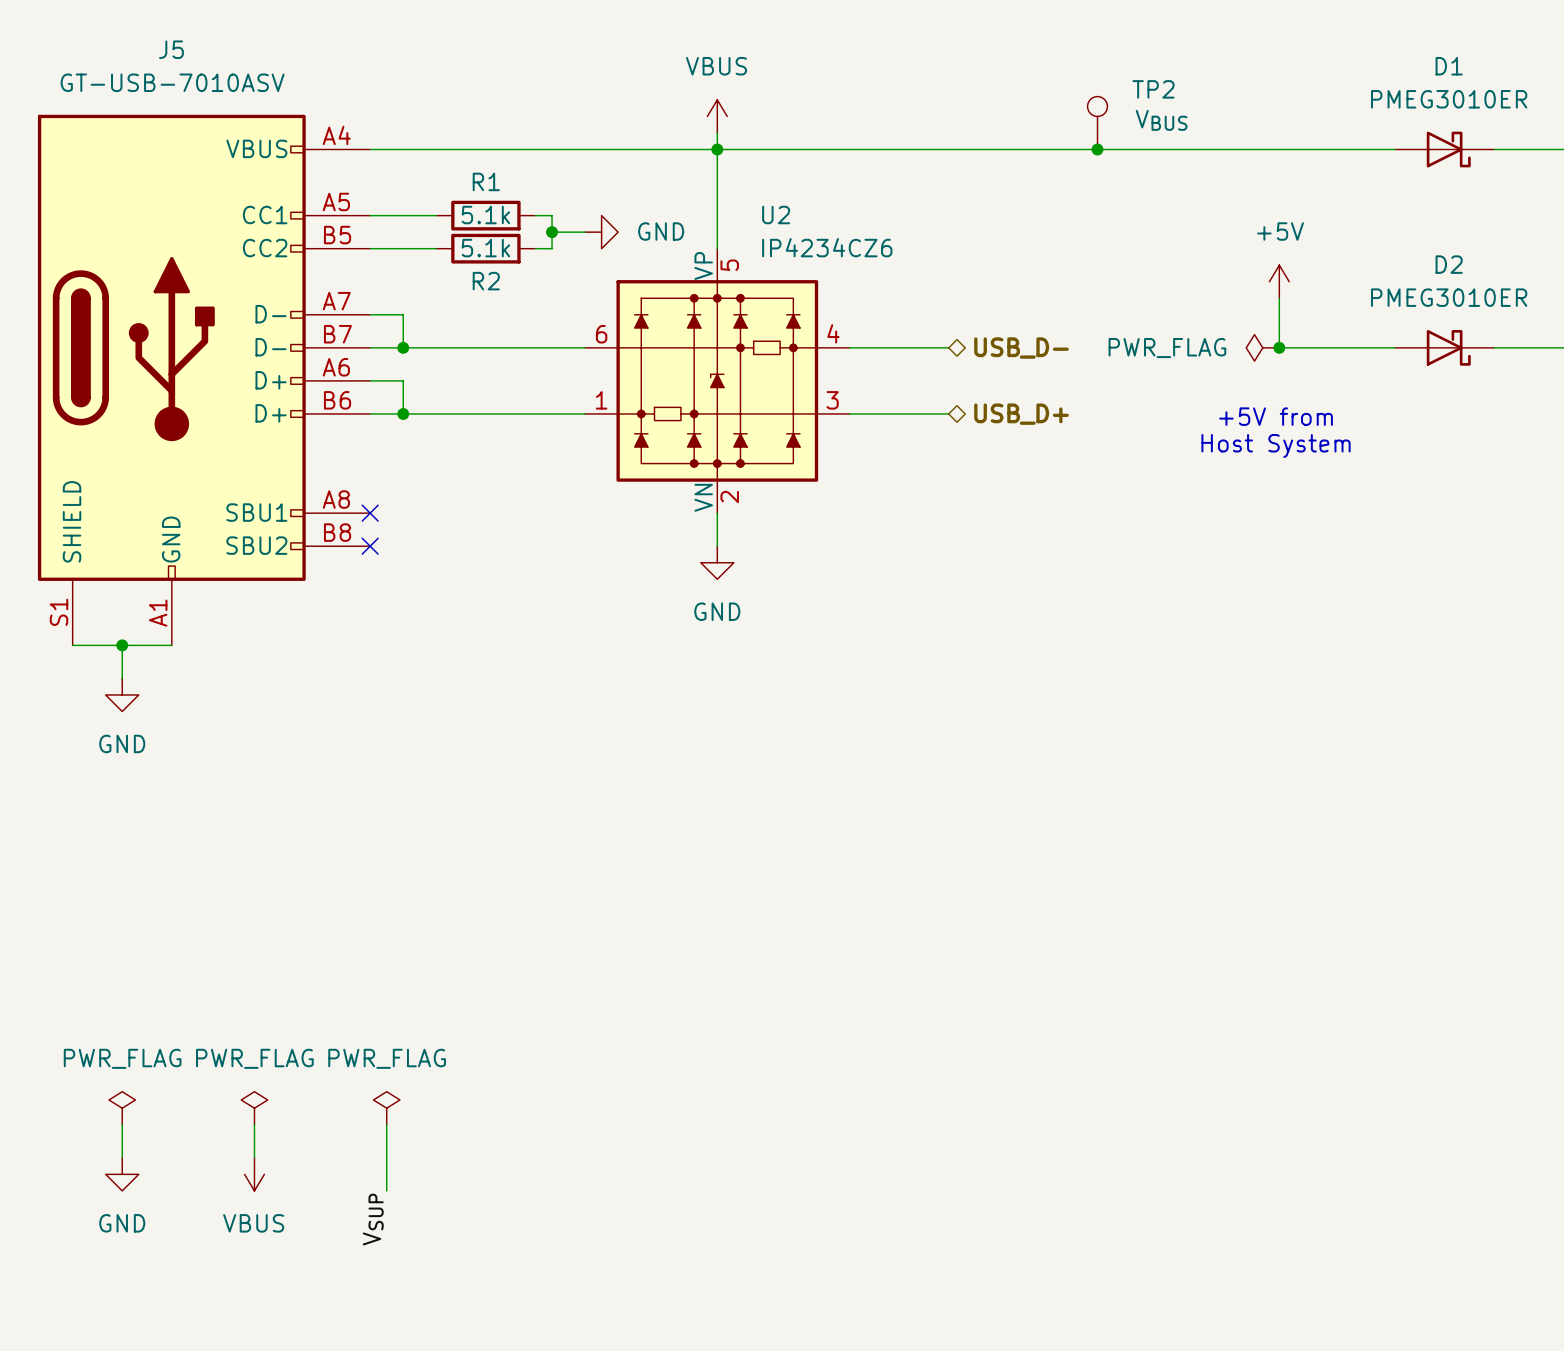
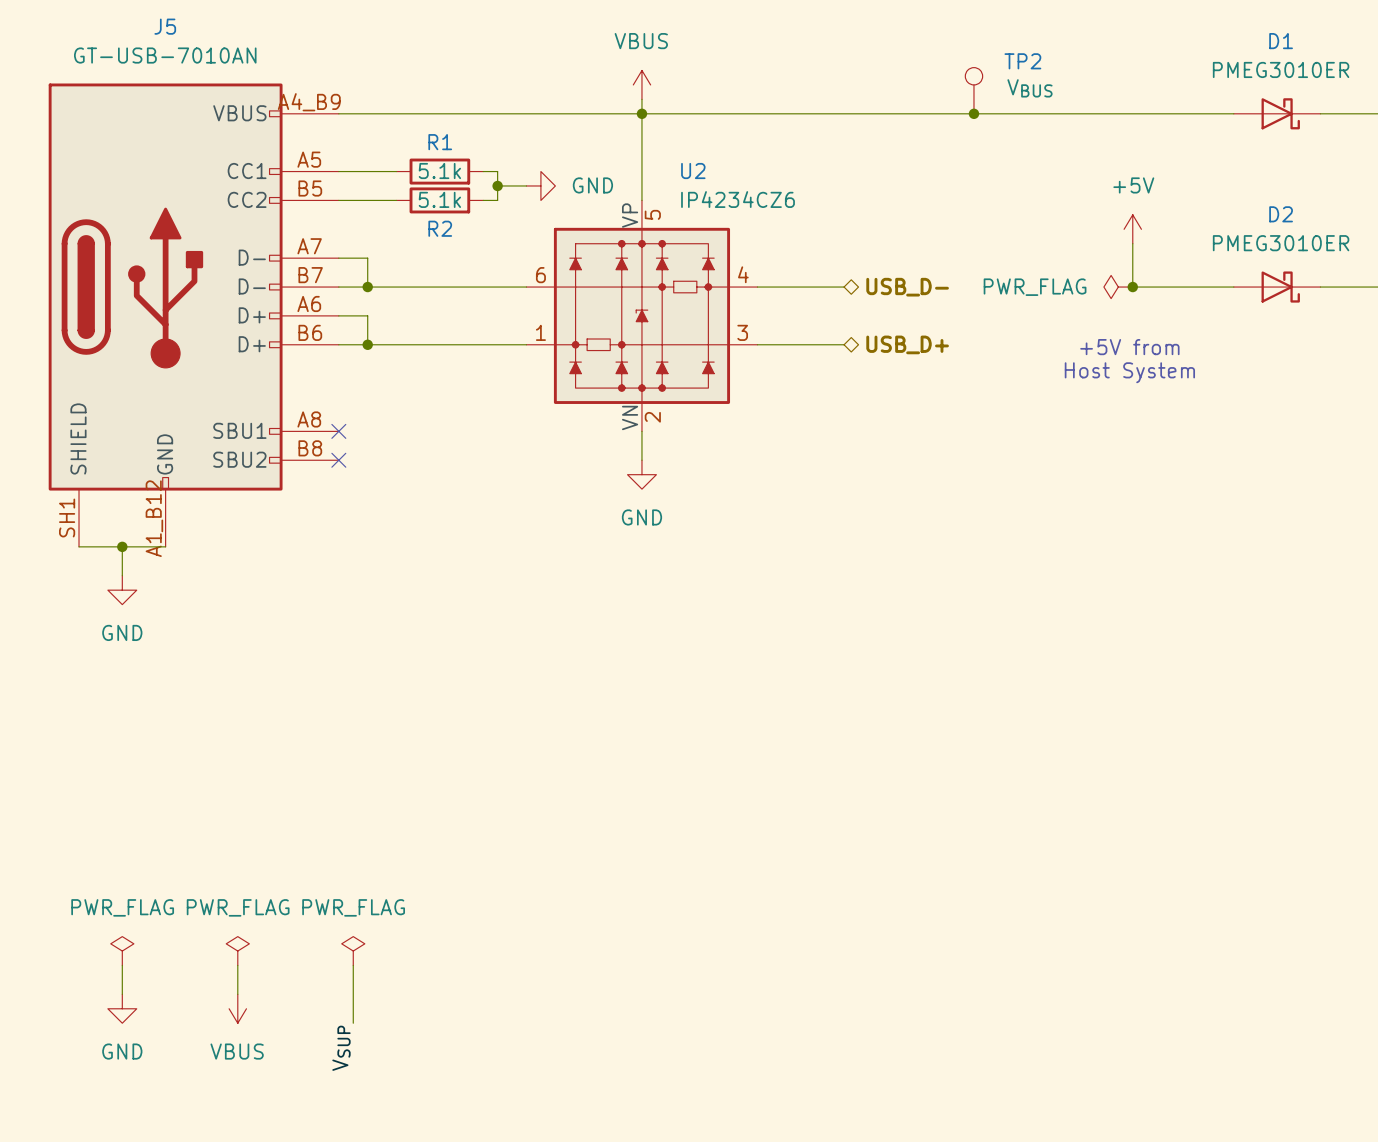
J5 value: GT-USB-7010ASV (172, 82) -> GT-USB-7010AN (165, 55)
J5 pin number: A4 (336, 135) -> A4_B9 (309, 102)
J5 pin number: S1 (59, 612) -> SH1 (67, 517)
J5 pin number: A1 (158, 613) -> A1_B12 (154, 518)

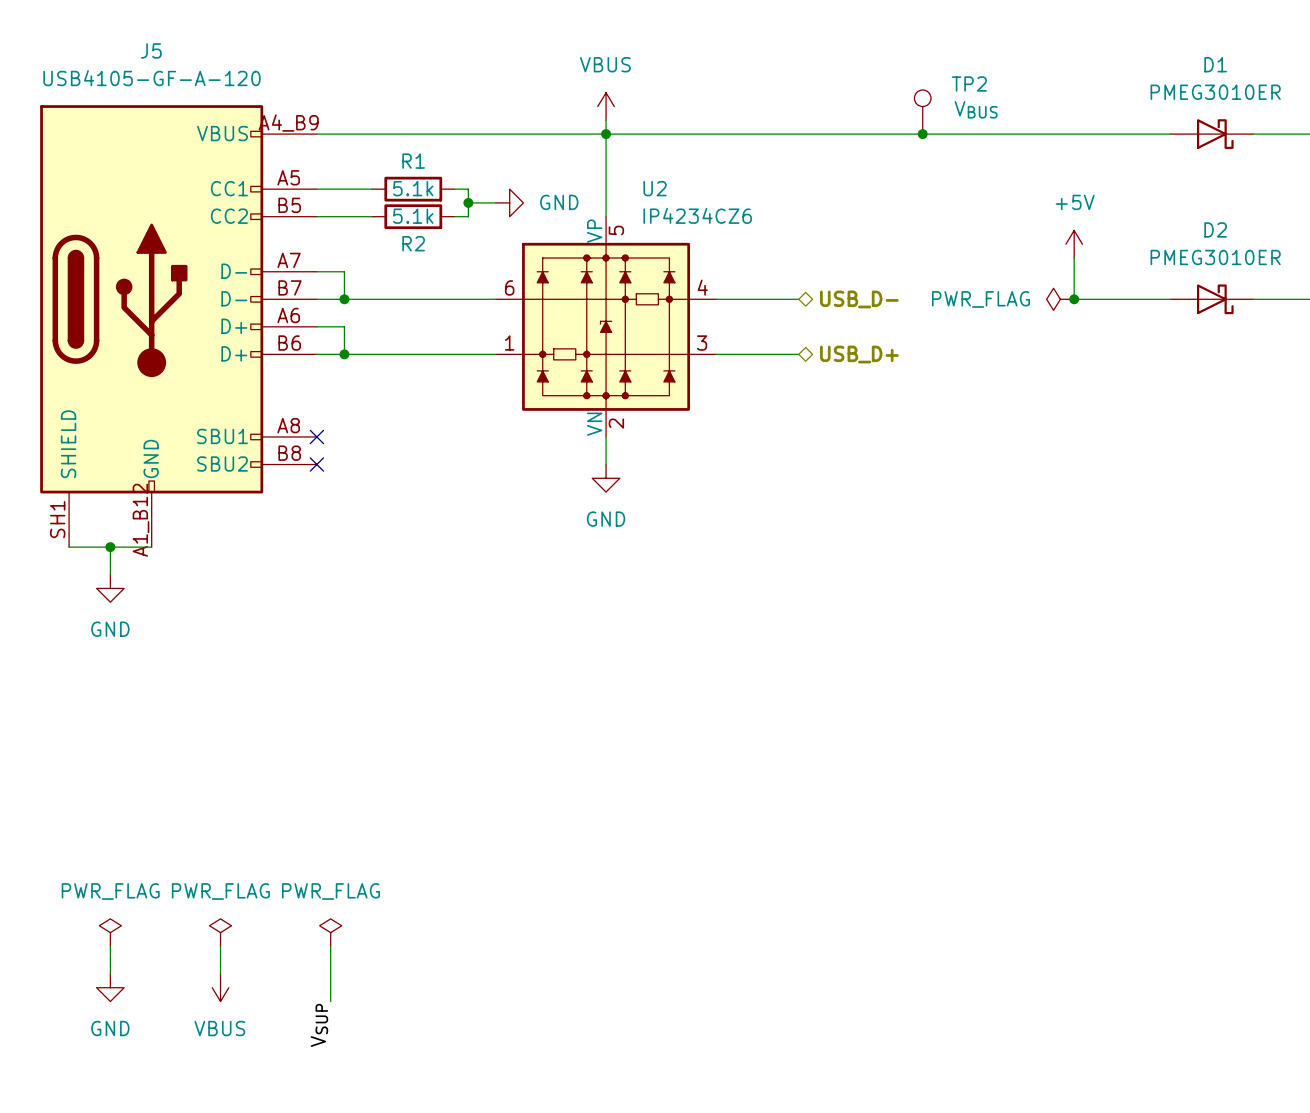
J5 value: GT-USB-7010AN (165, 55) -> USB4105-GF-A-120 (152, 78)
text: +5V from (1129, 347) -> none
text: Host System (1129, 372) -> none

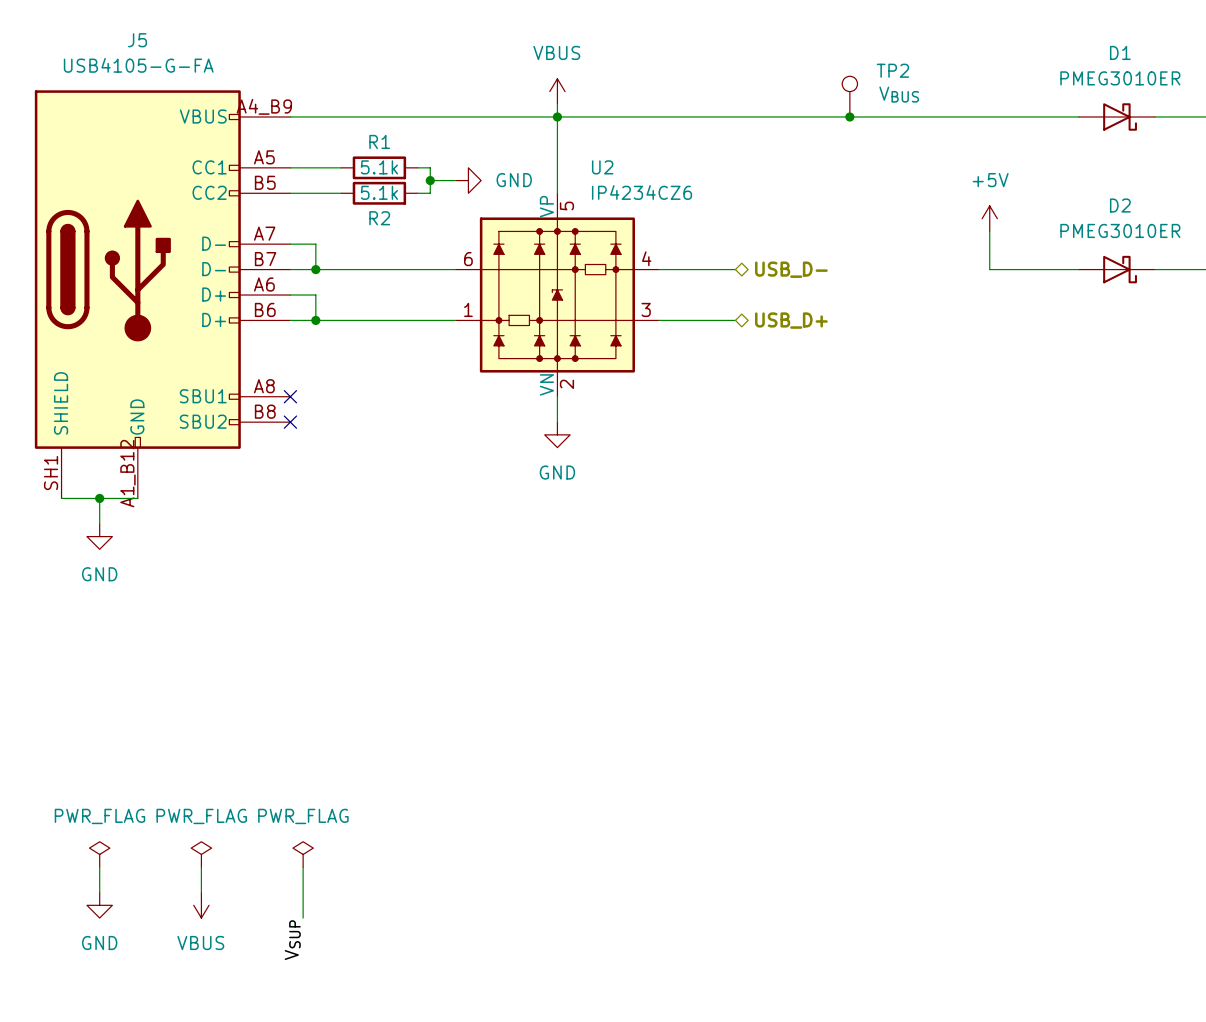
J5 value: USB4105-GF-A-120 (152, 78) -> USB4105-G-FA (138, 65)
power symbol: PWR_FLAG (1060, 299) -> none
junction: (1074, 299) -> none

